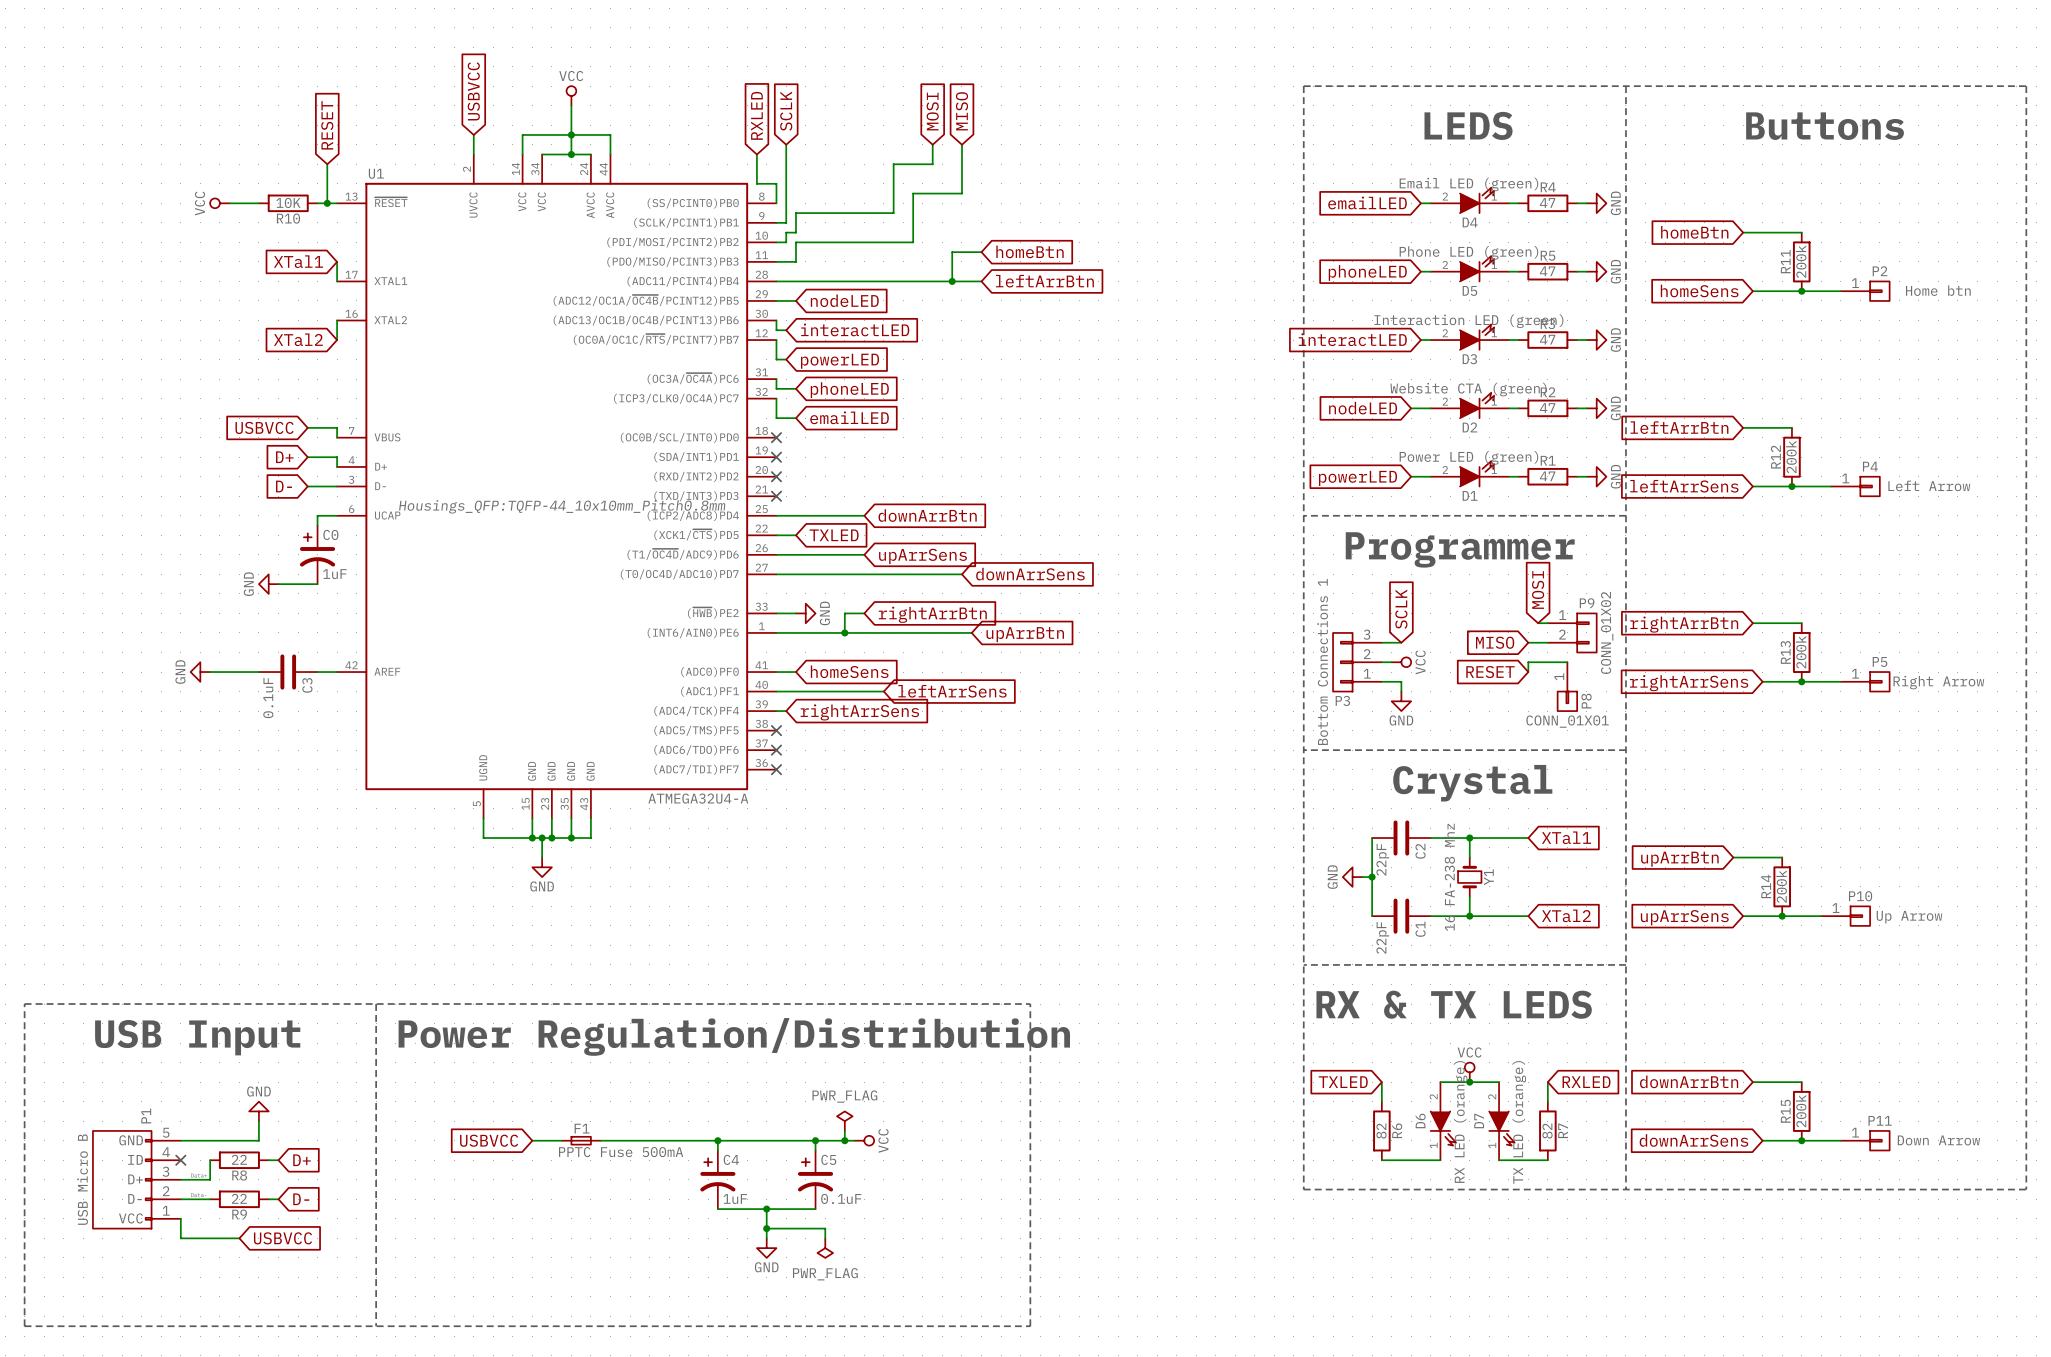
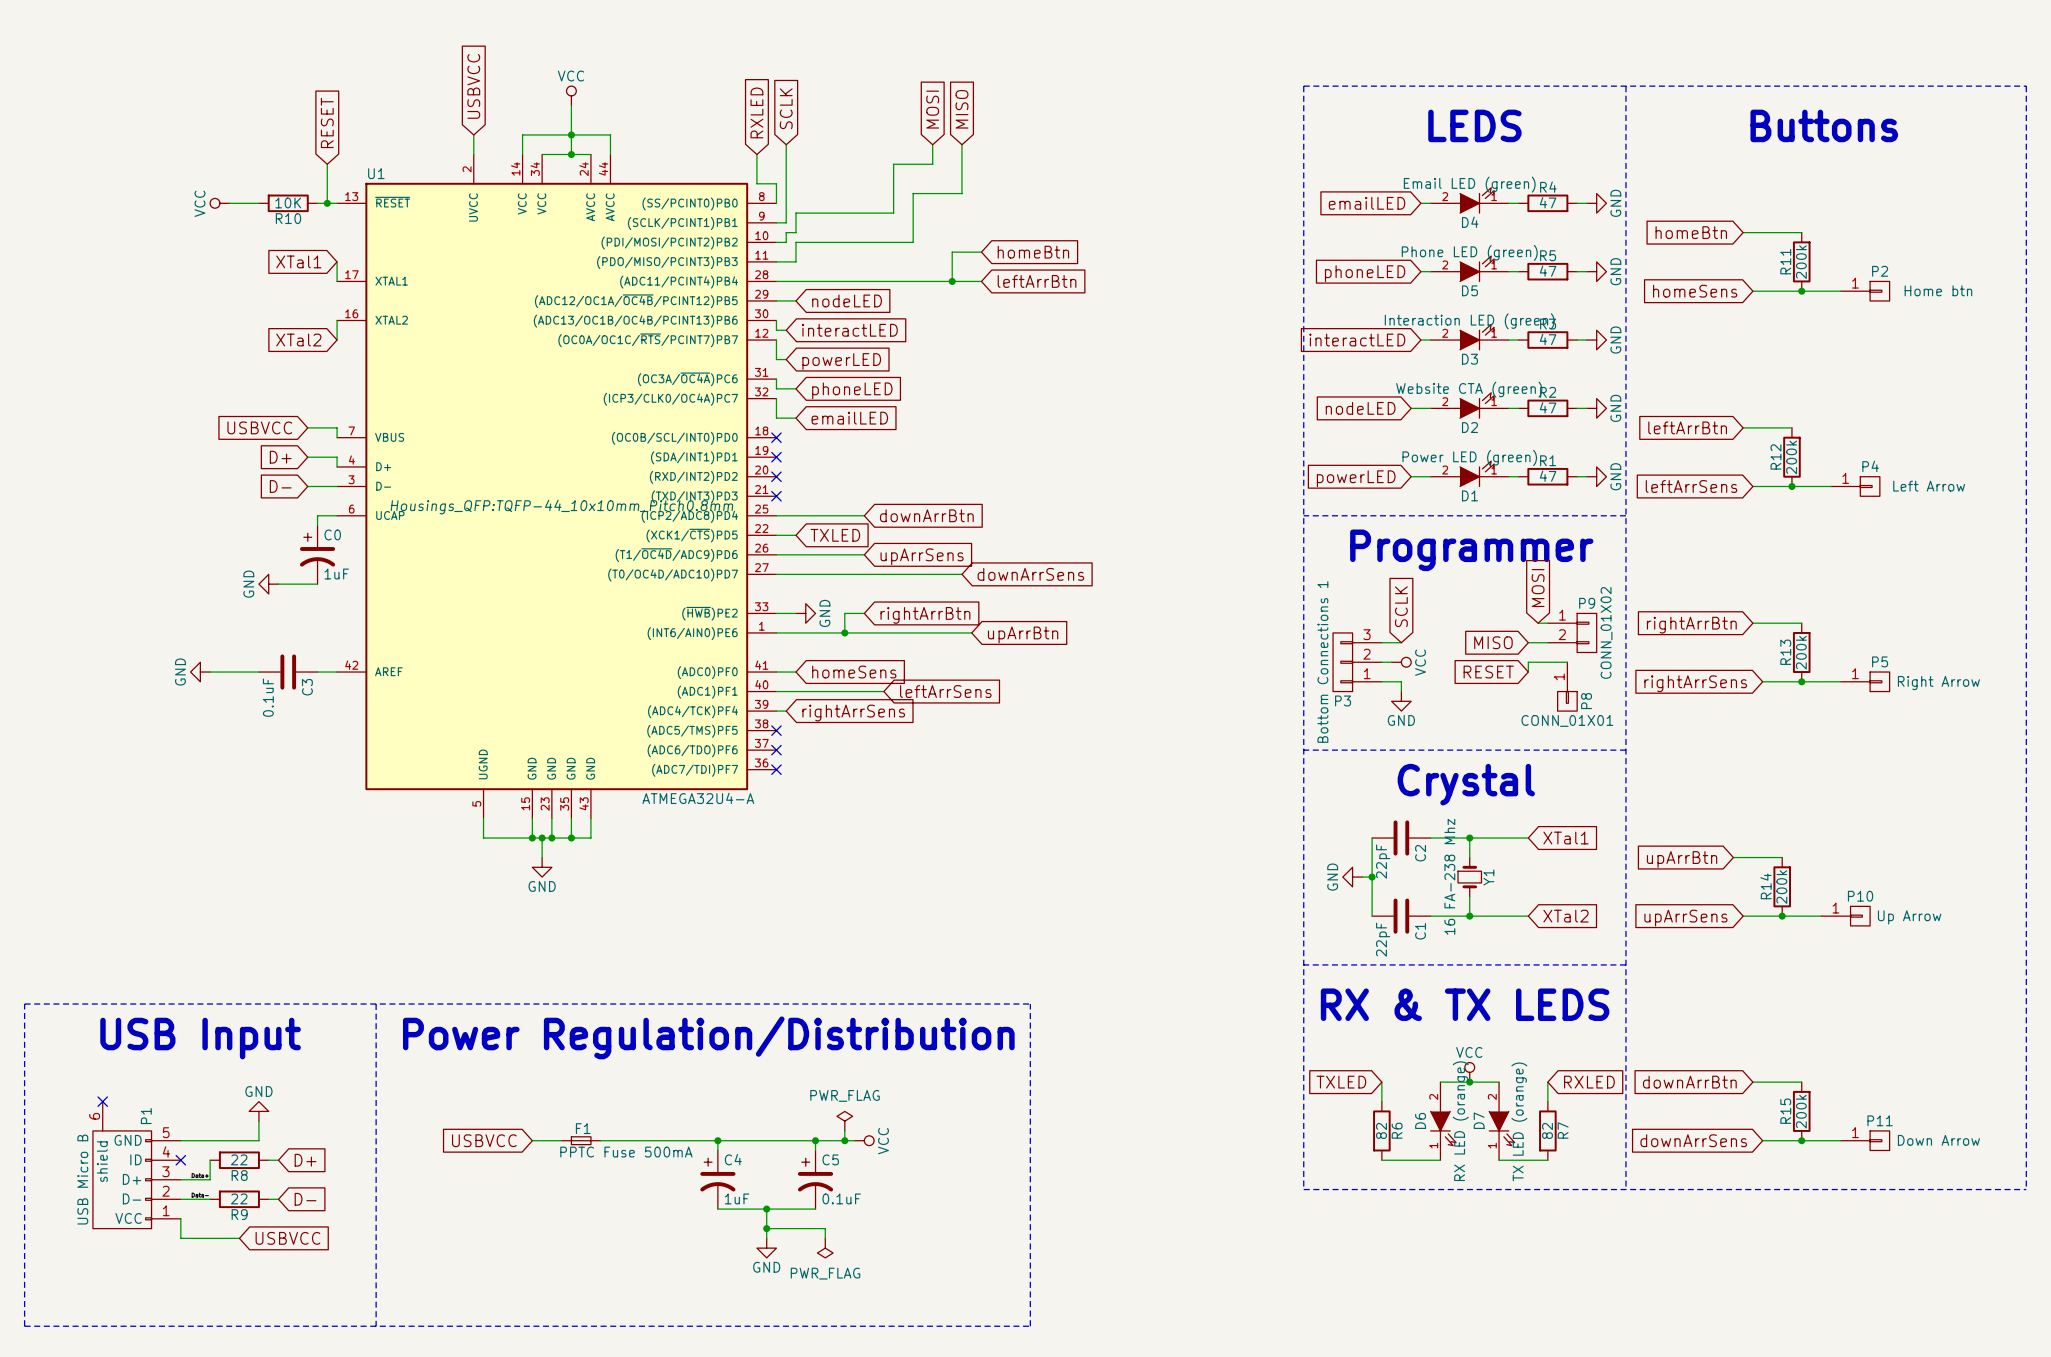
no-connect mark: none -> (102, 1101)
P1 symbol: [92, 1130, 181, 1229] -> [92, 1101, 181, 1229]

